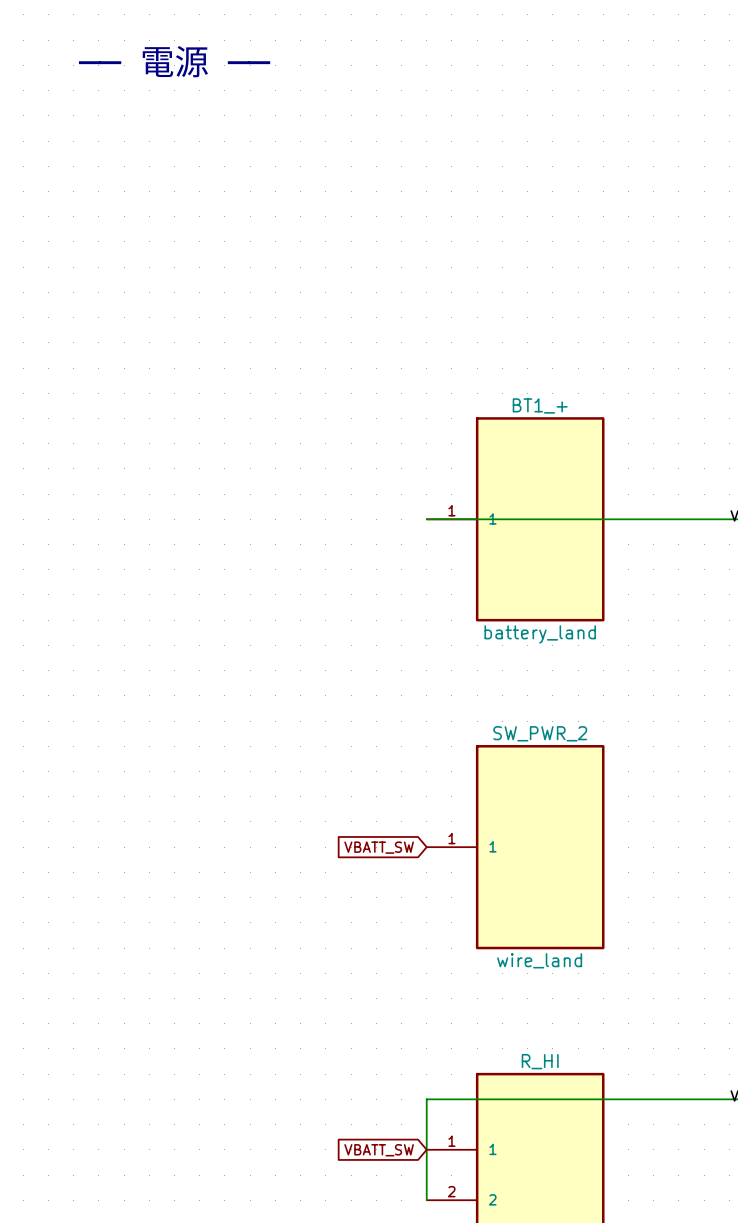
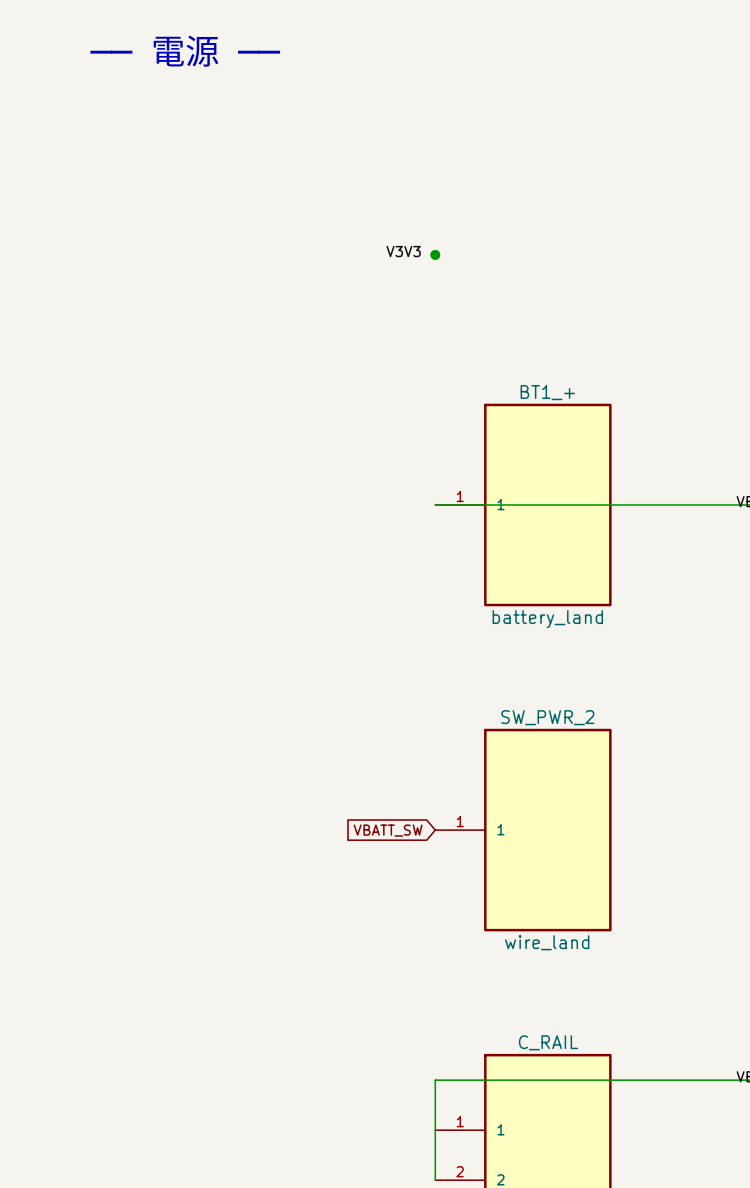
label: none -> V3V3 (403, 251)
junction: none -> (435, 254)
R_HI name: R_HI (540, 1061) -> C_RAIL (548, 1042)
global label: VBATT_SW (379, 1150) -> none

